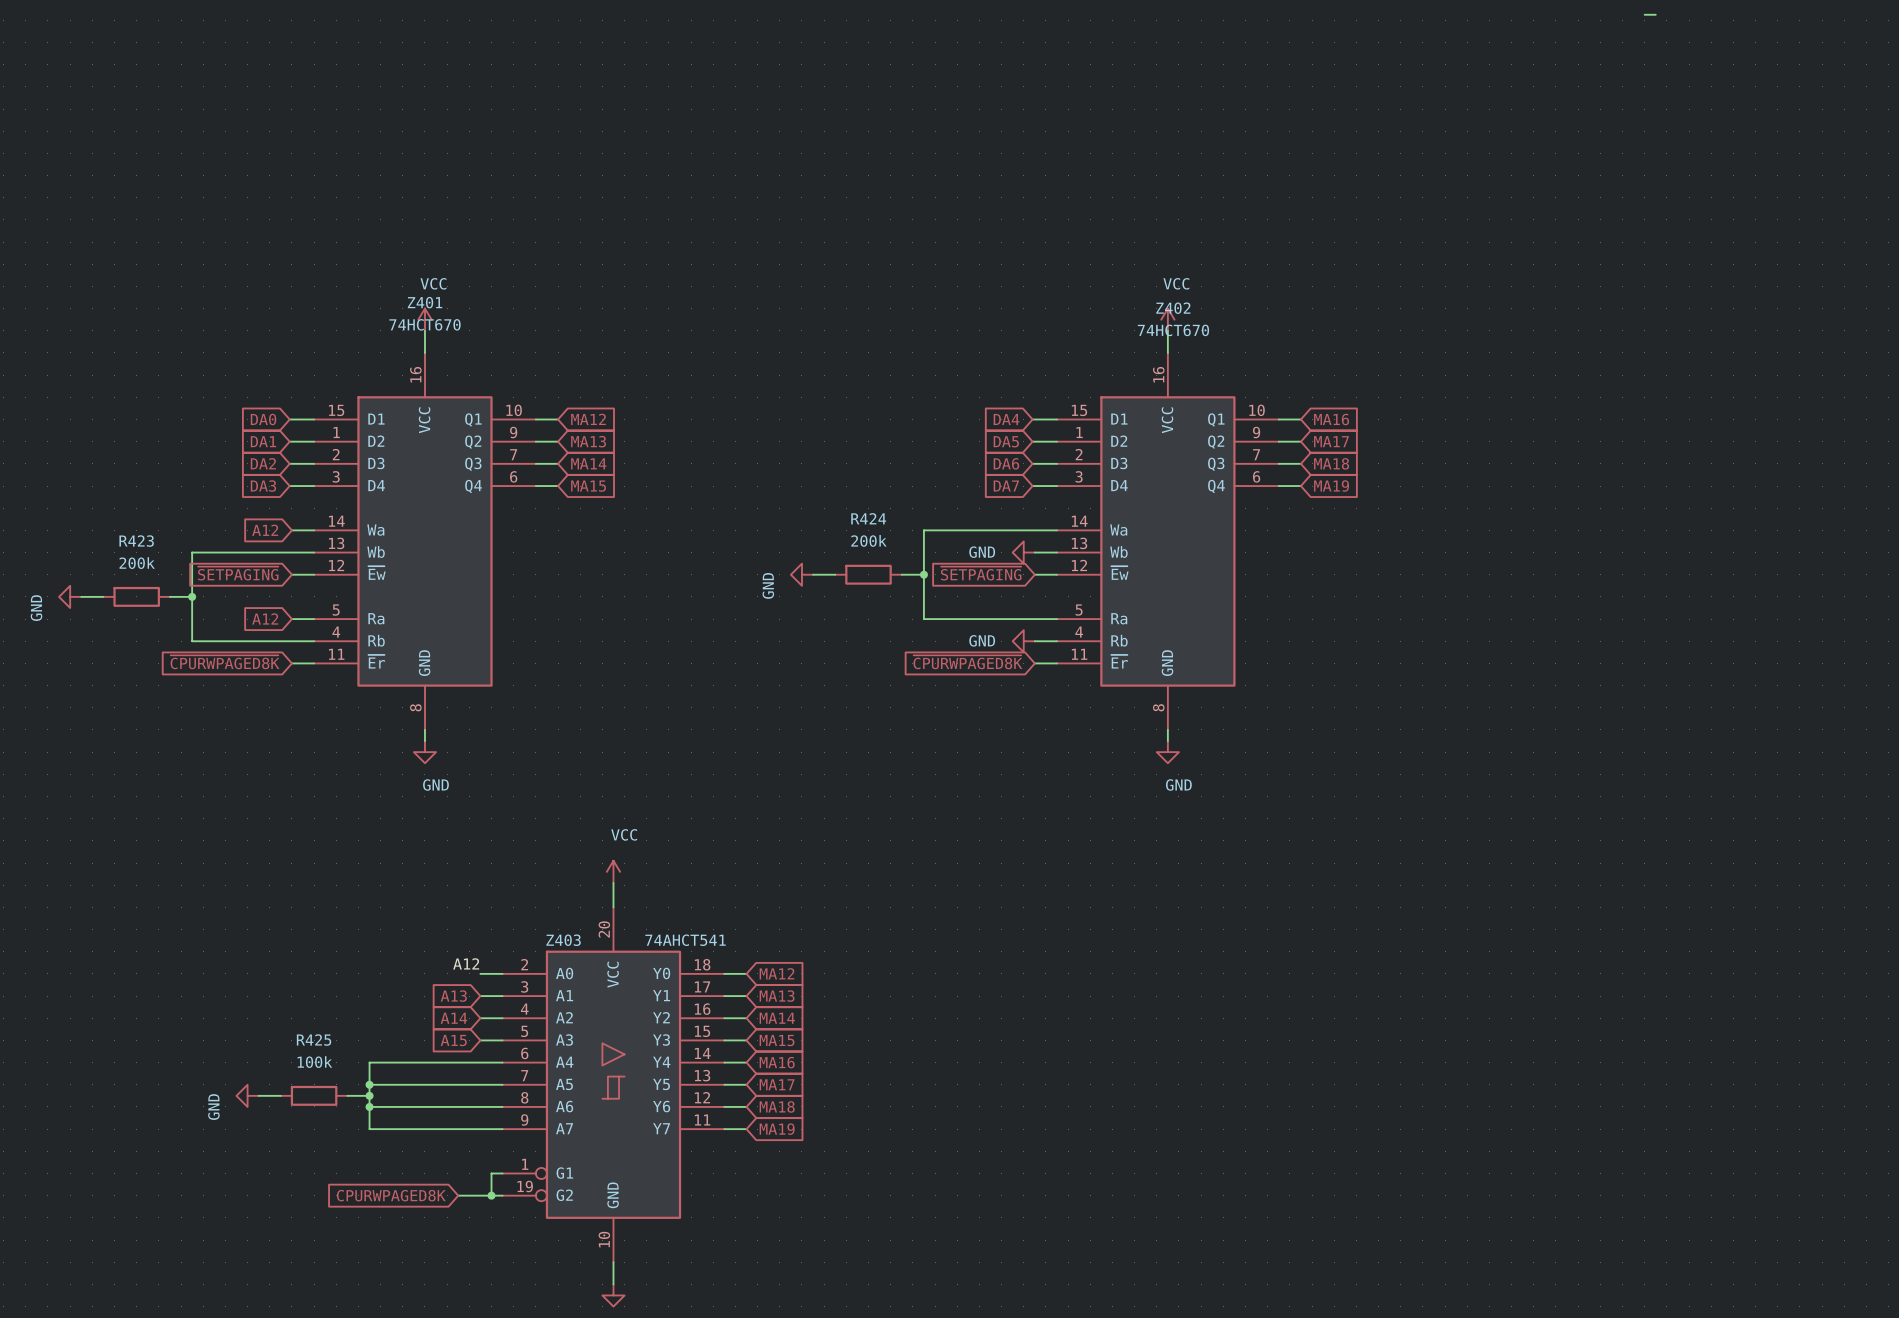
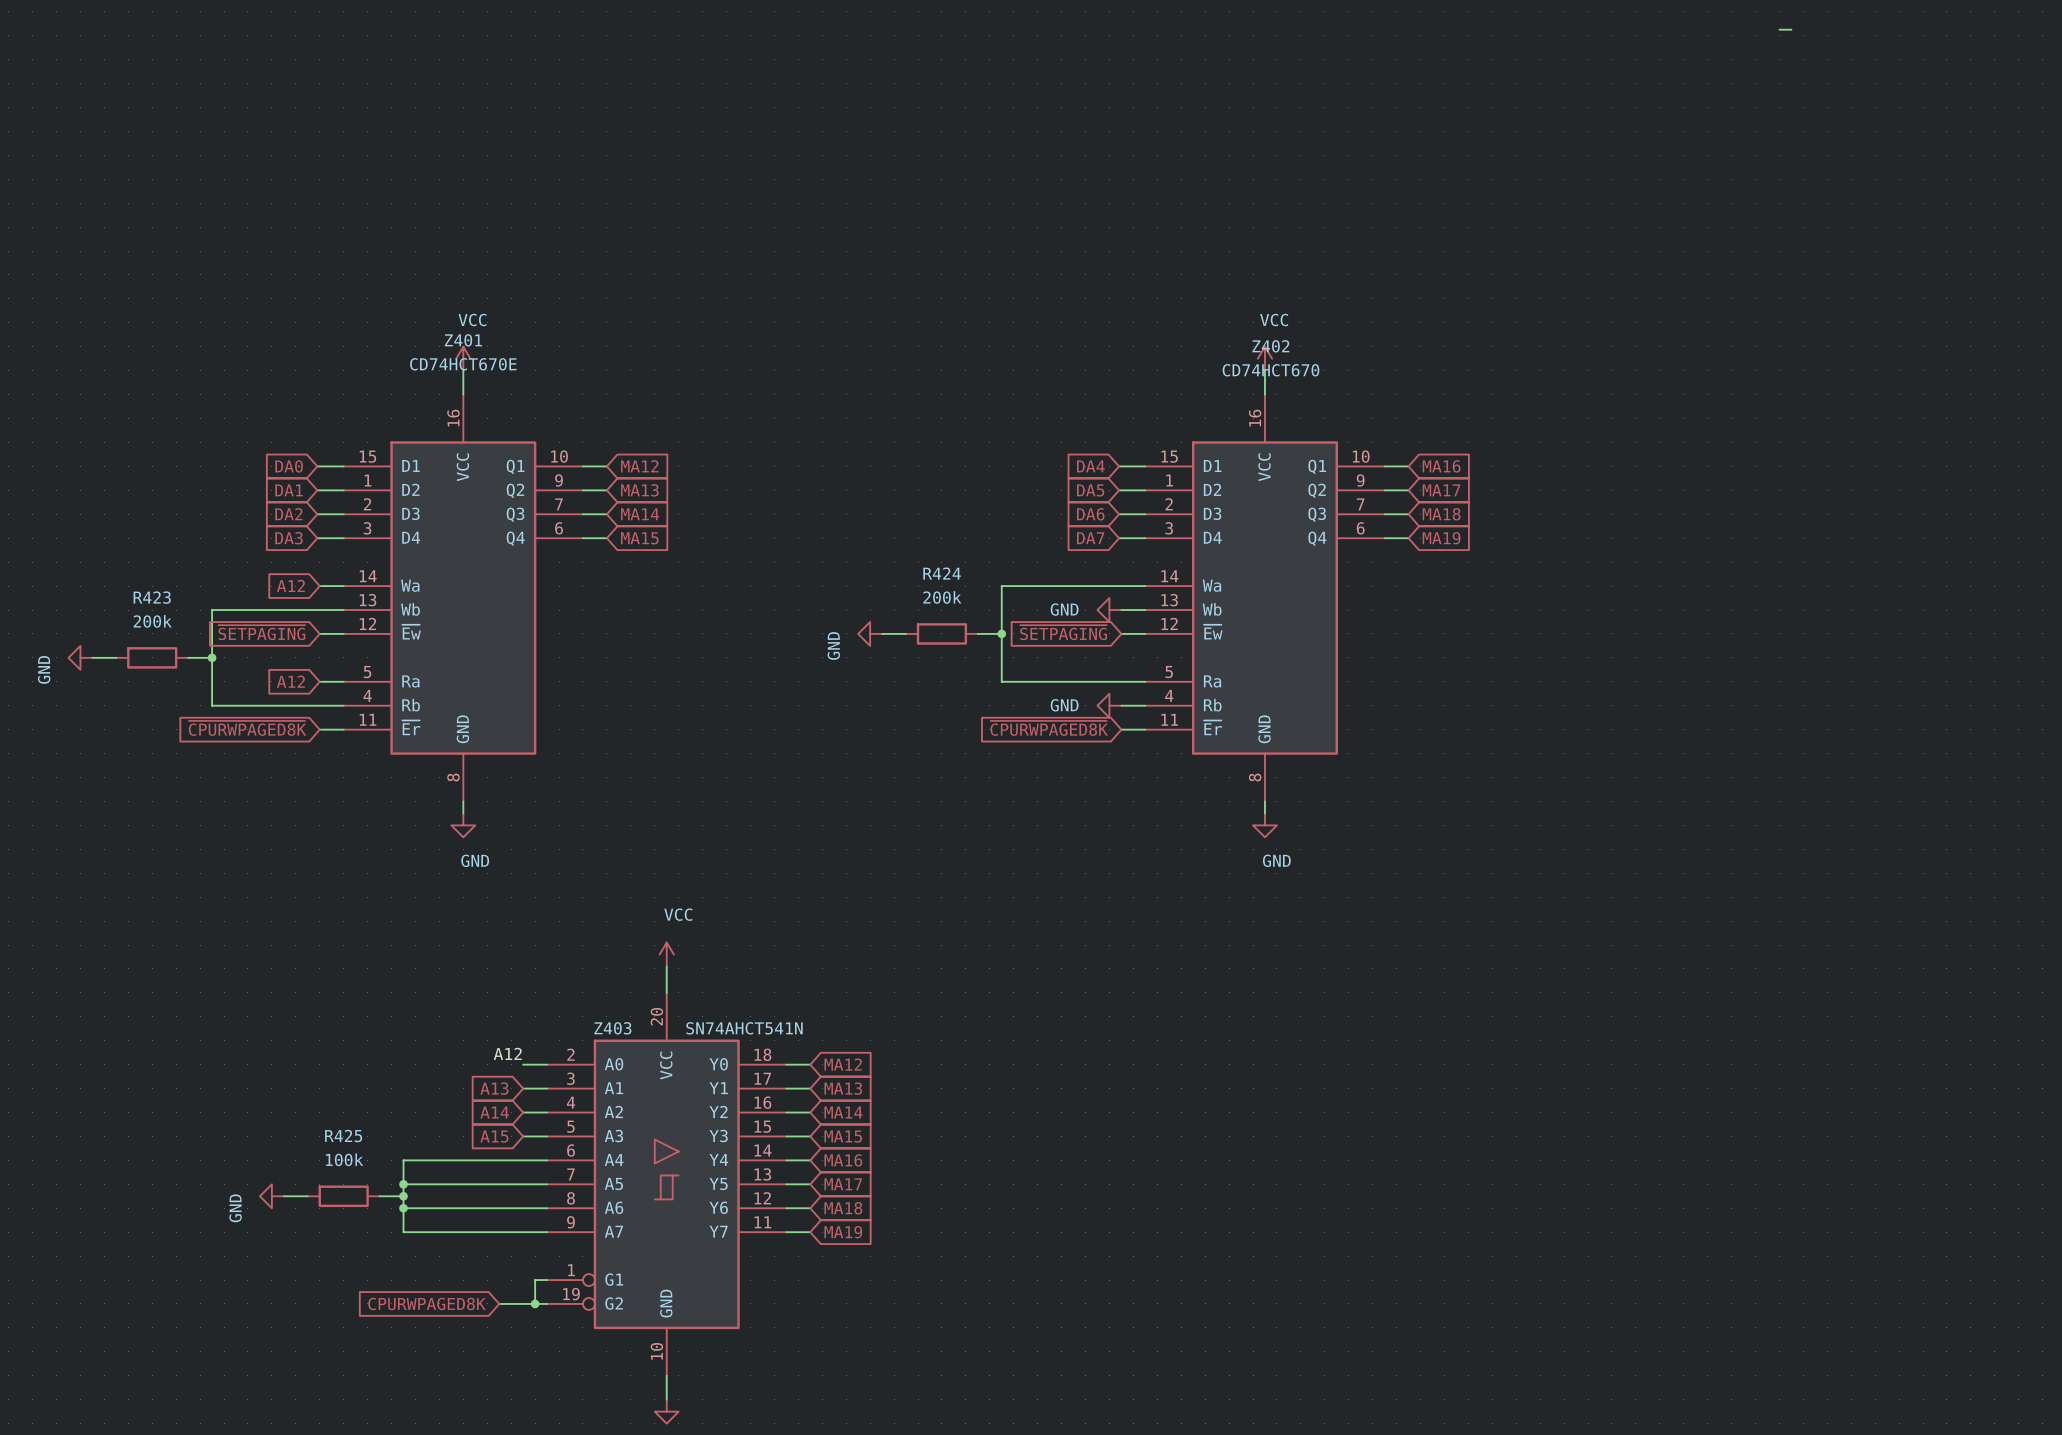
Z401 value: 74HCT670 (425, 324) -> CD74HCT670E (463, 364)
Z402 value: 74HCT670 (1173, 330) -> CD74HCT670 (1270, 370)
Z403 value: 74AHCT541 (685, 940) -> SN74AHCT541N (744, 1028)

